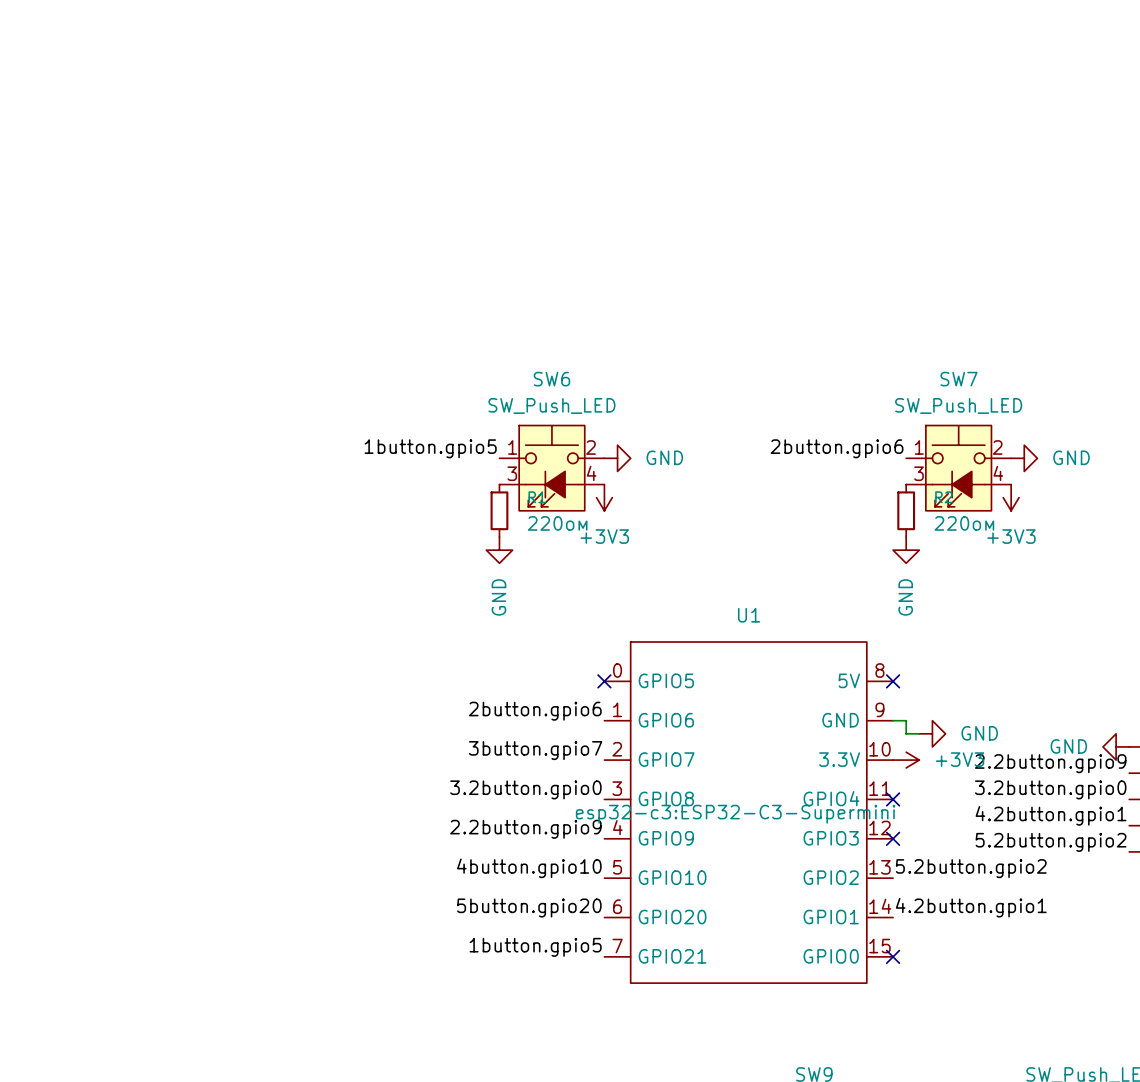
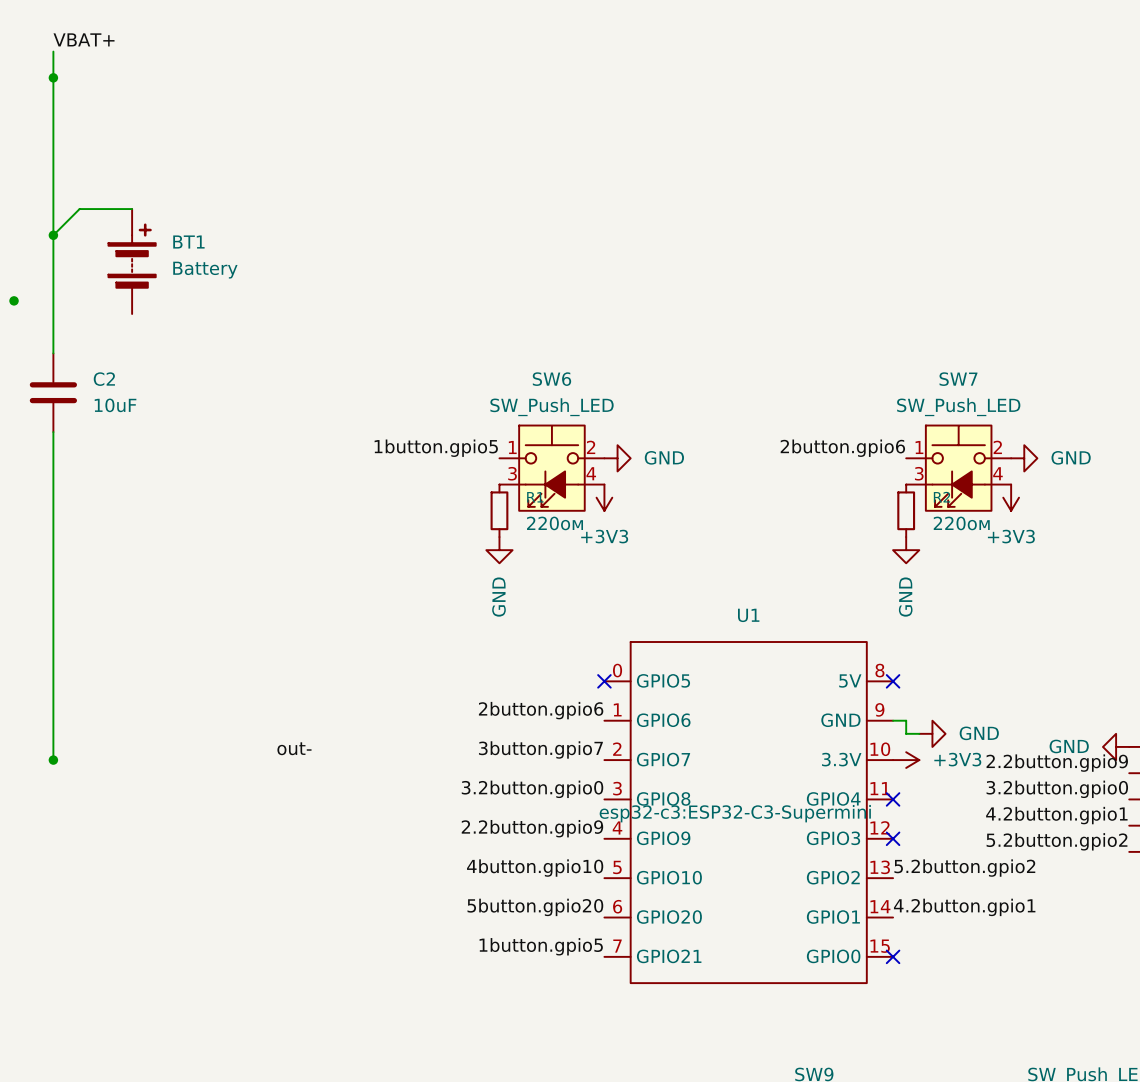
label: none -> VBAT+ (84, 39)
wire: none -> (53, 51) (53, 353)
junction: none -> (53, 77)
wire: none -> (132, 209) (79, 209) (53, 235)
junction: none -> (53, 235)
BT1: none -> Battery (132, 261)
junction: none -> (14, 300)
C2: none -> 10uF (53, 392)
wire: none -> (53, 432) (53, 760)
label: none -> out- (294, 748)
junction: none -> (53, 760)

